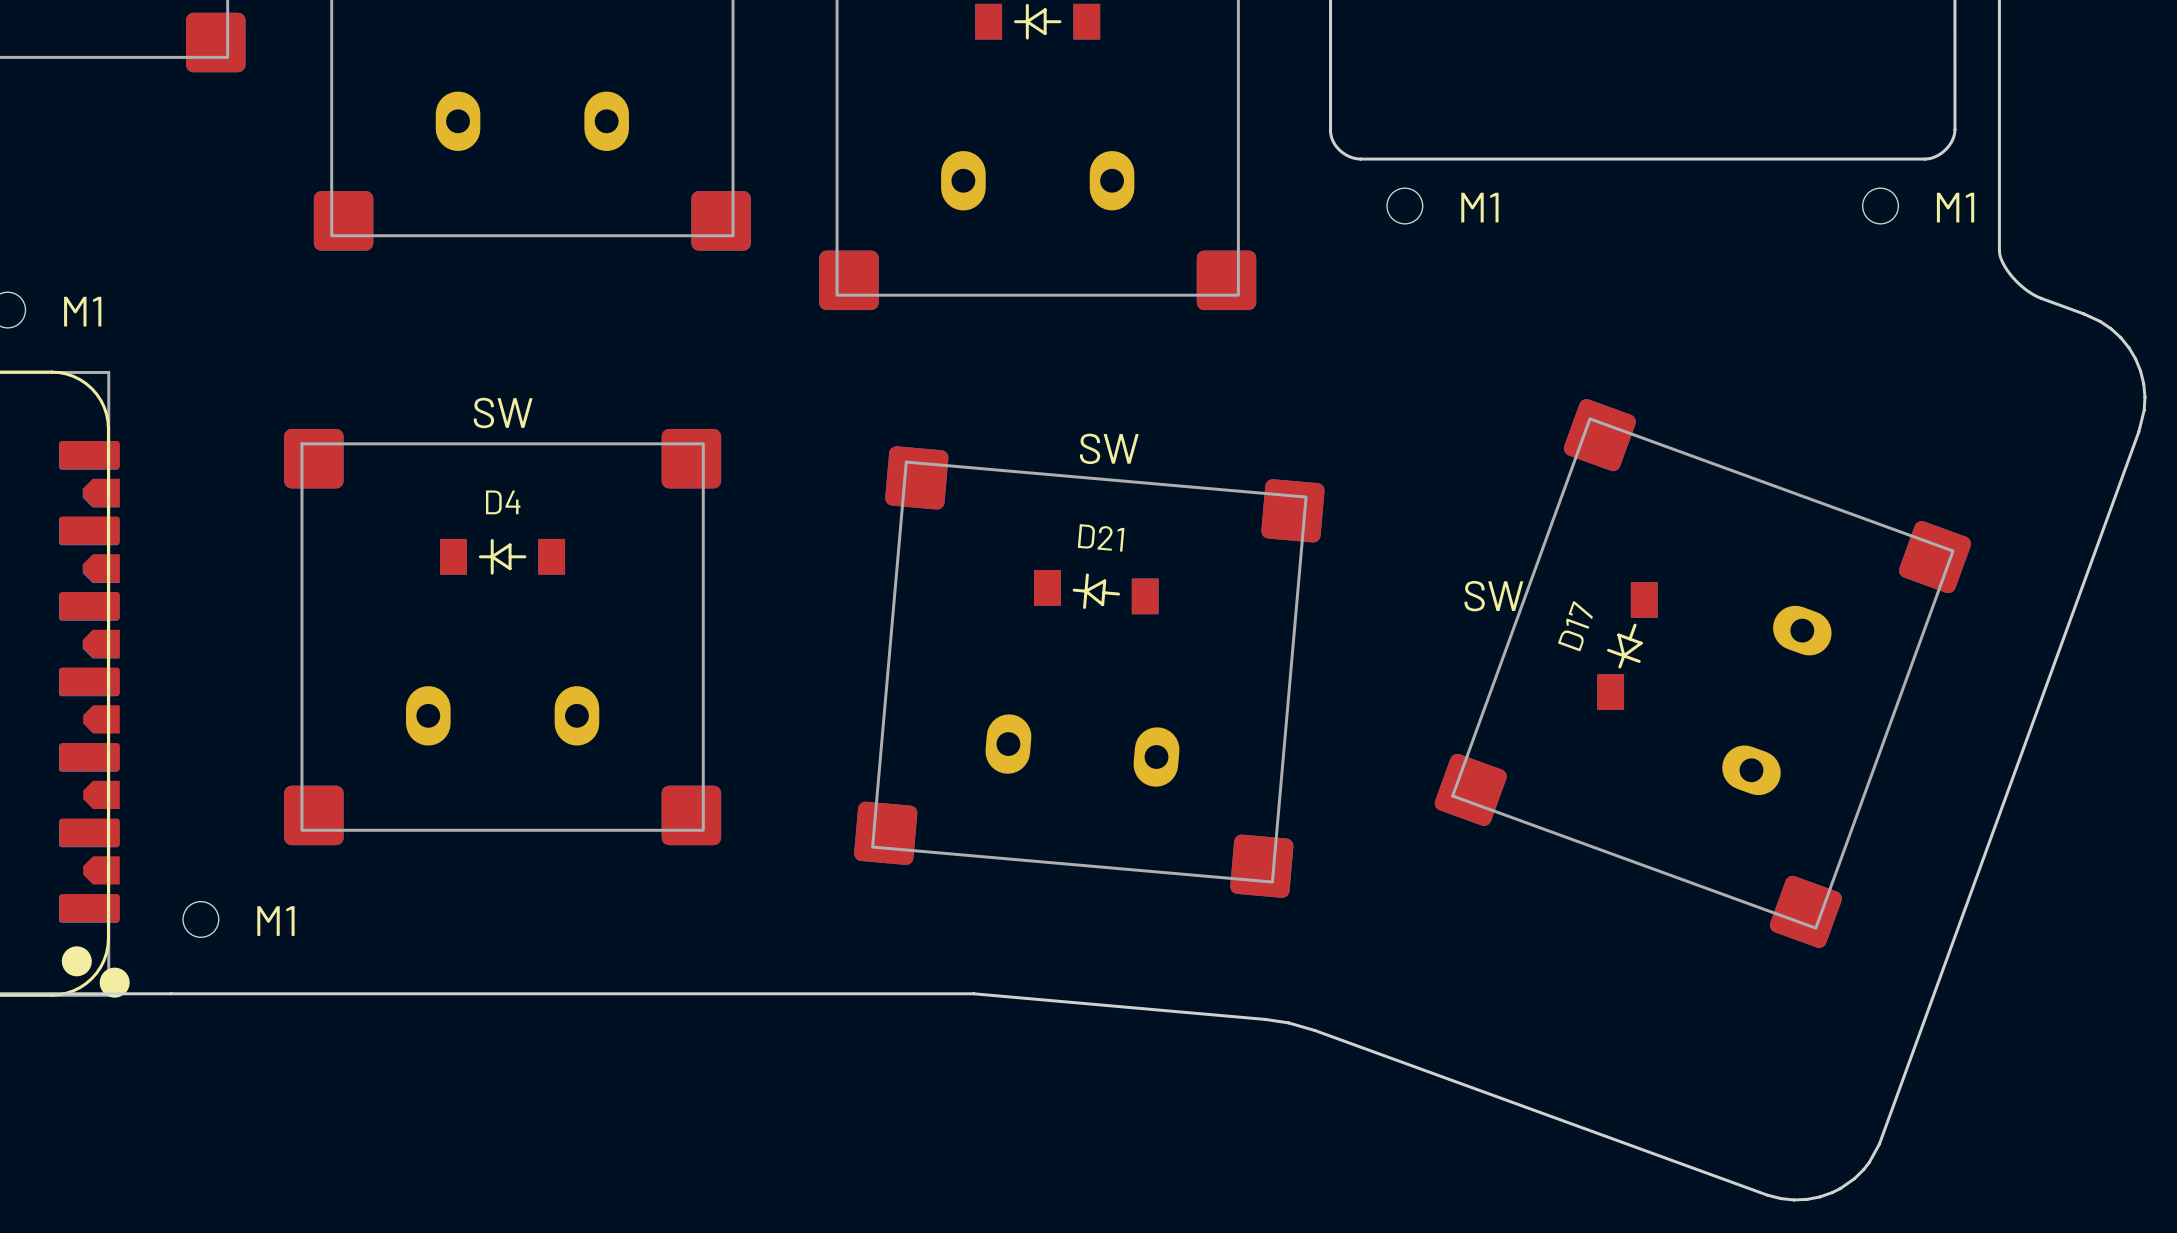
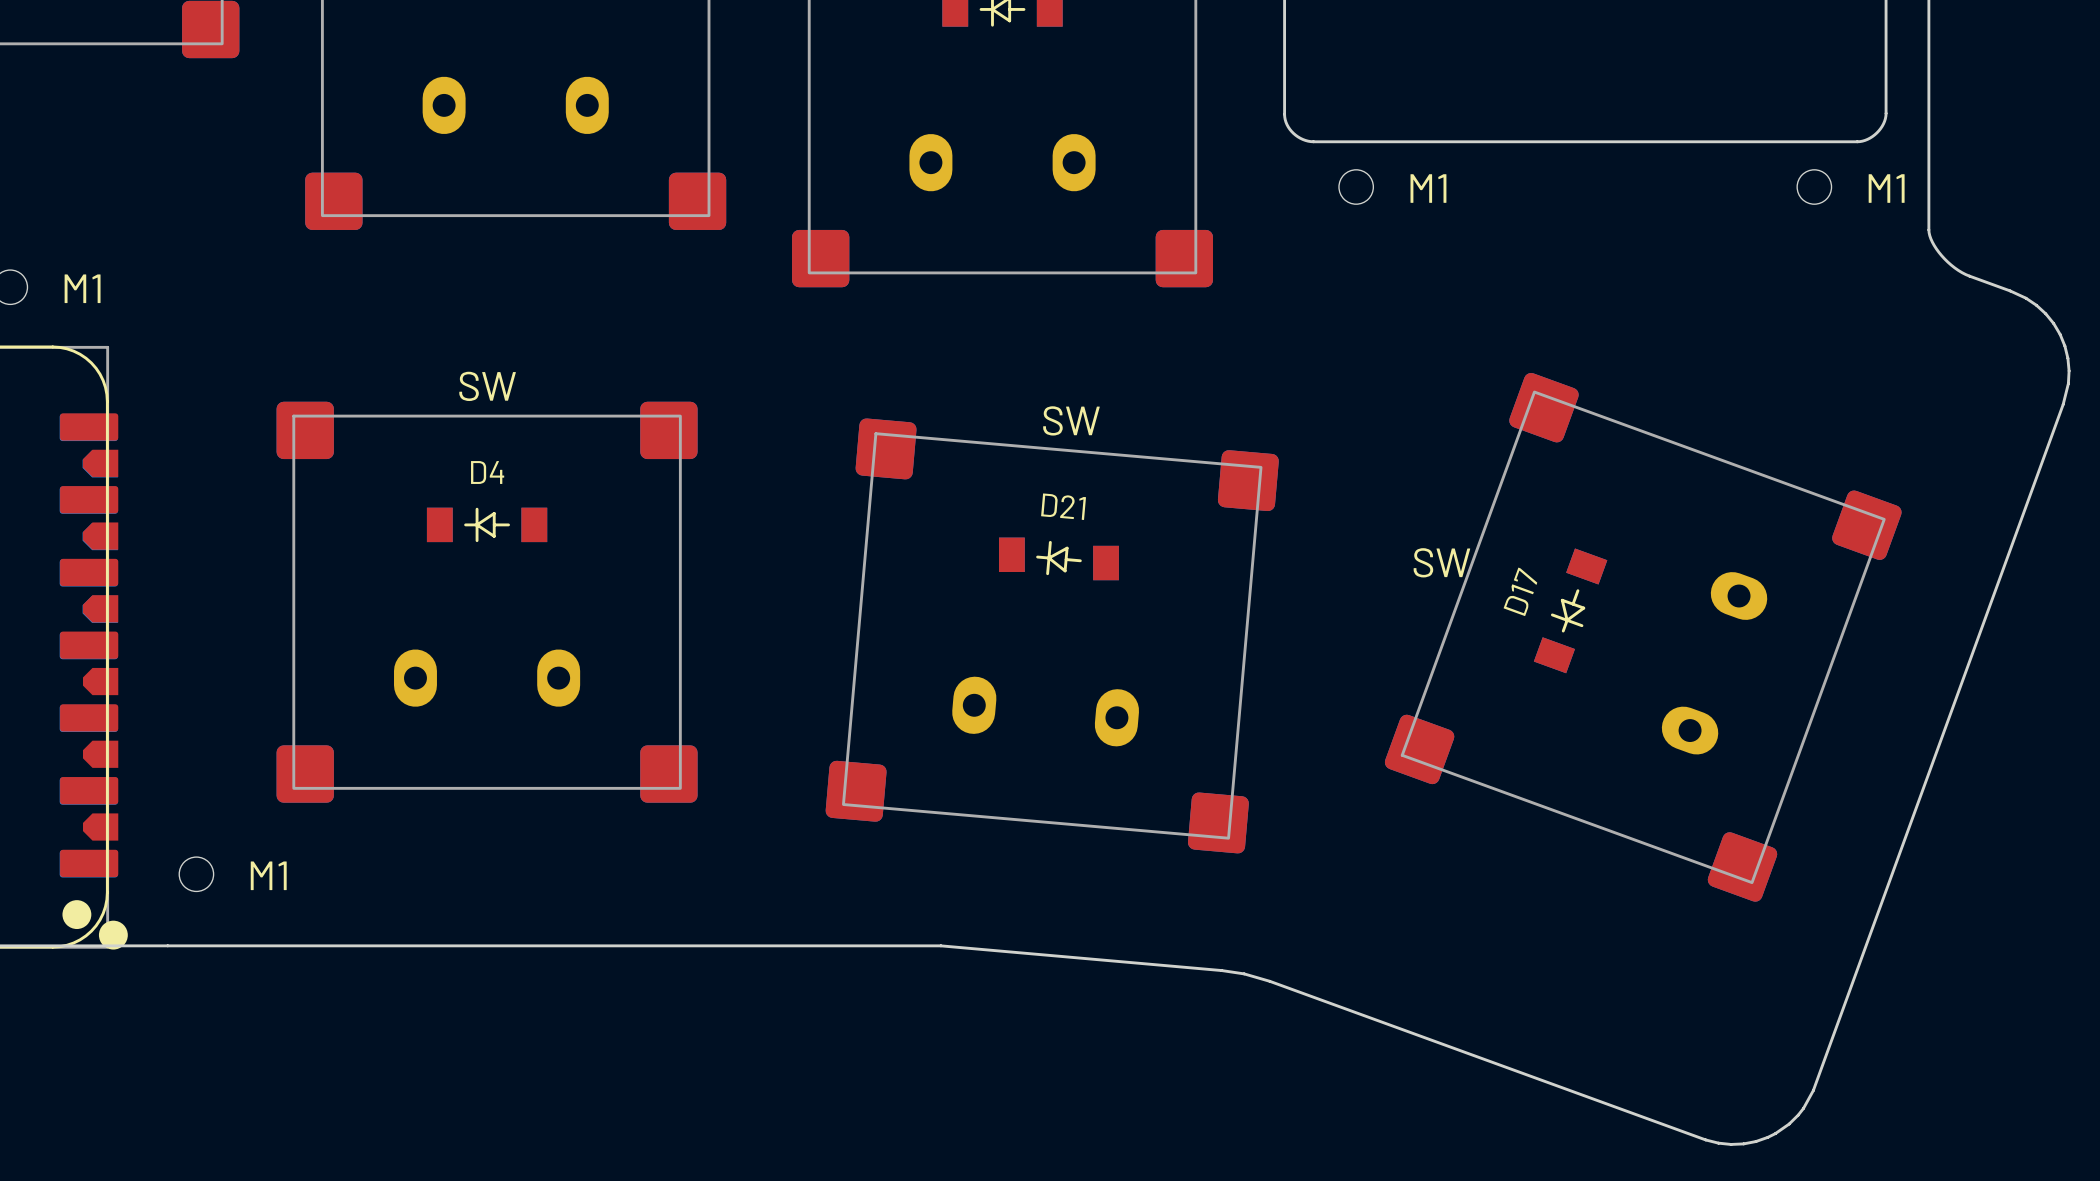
D17 footprint: [1597, 582, 1658, 710] -> [1533, 548, 1608, 674]

